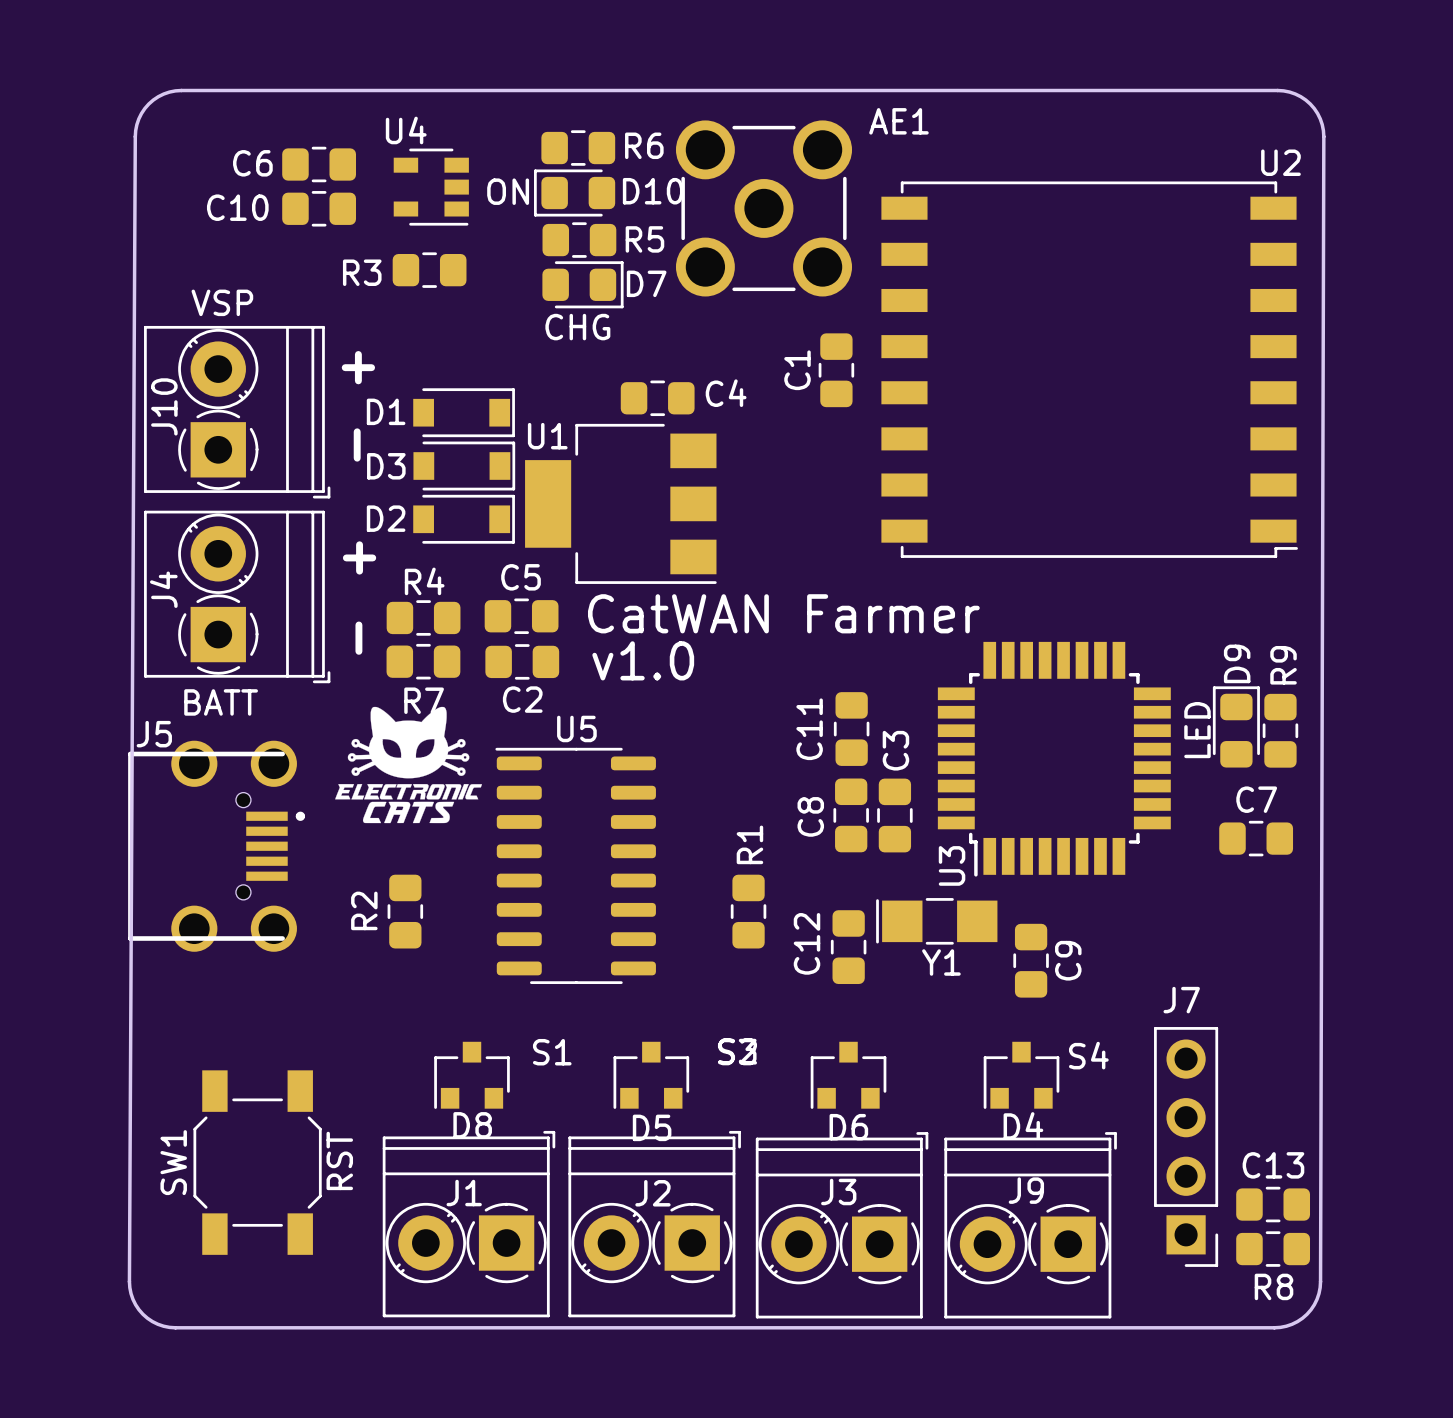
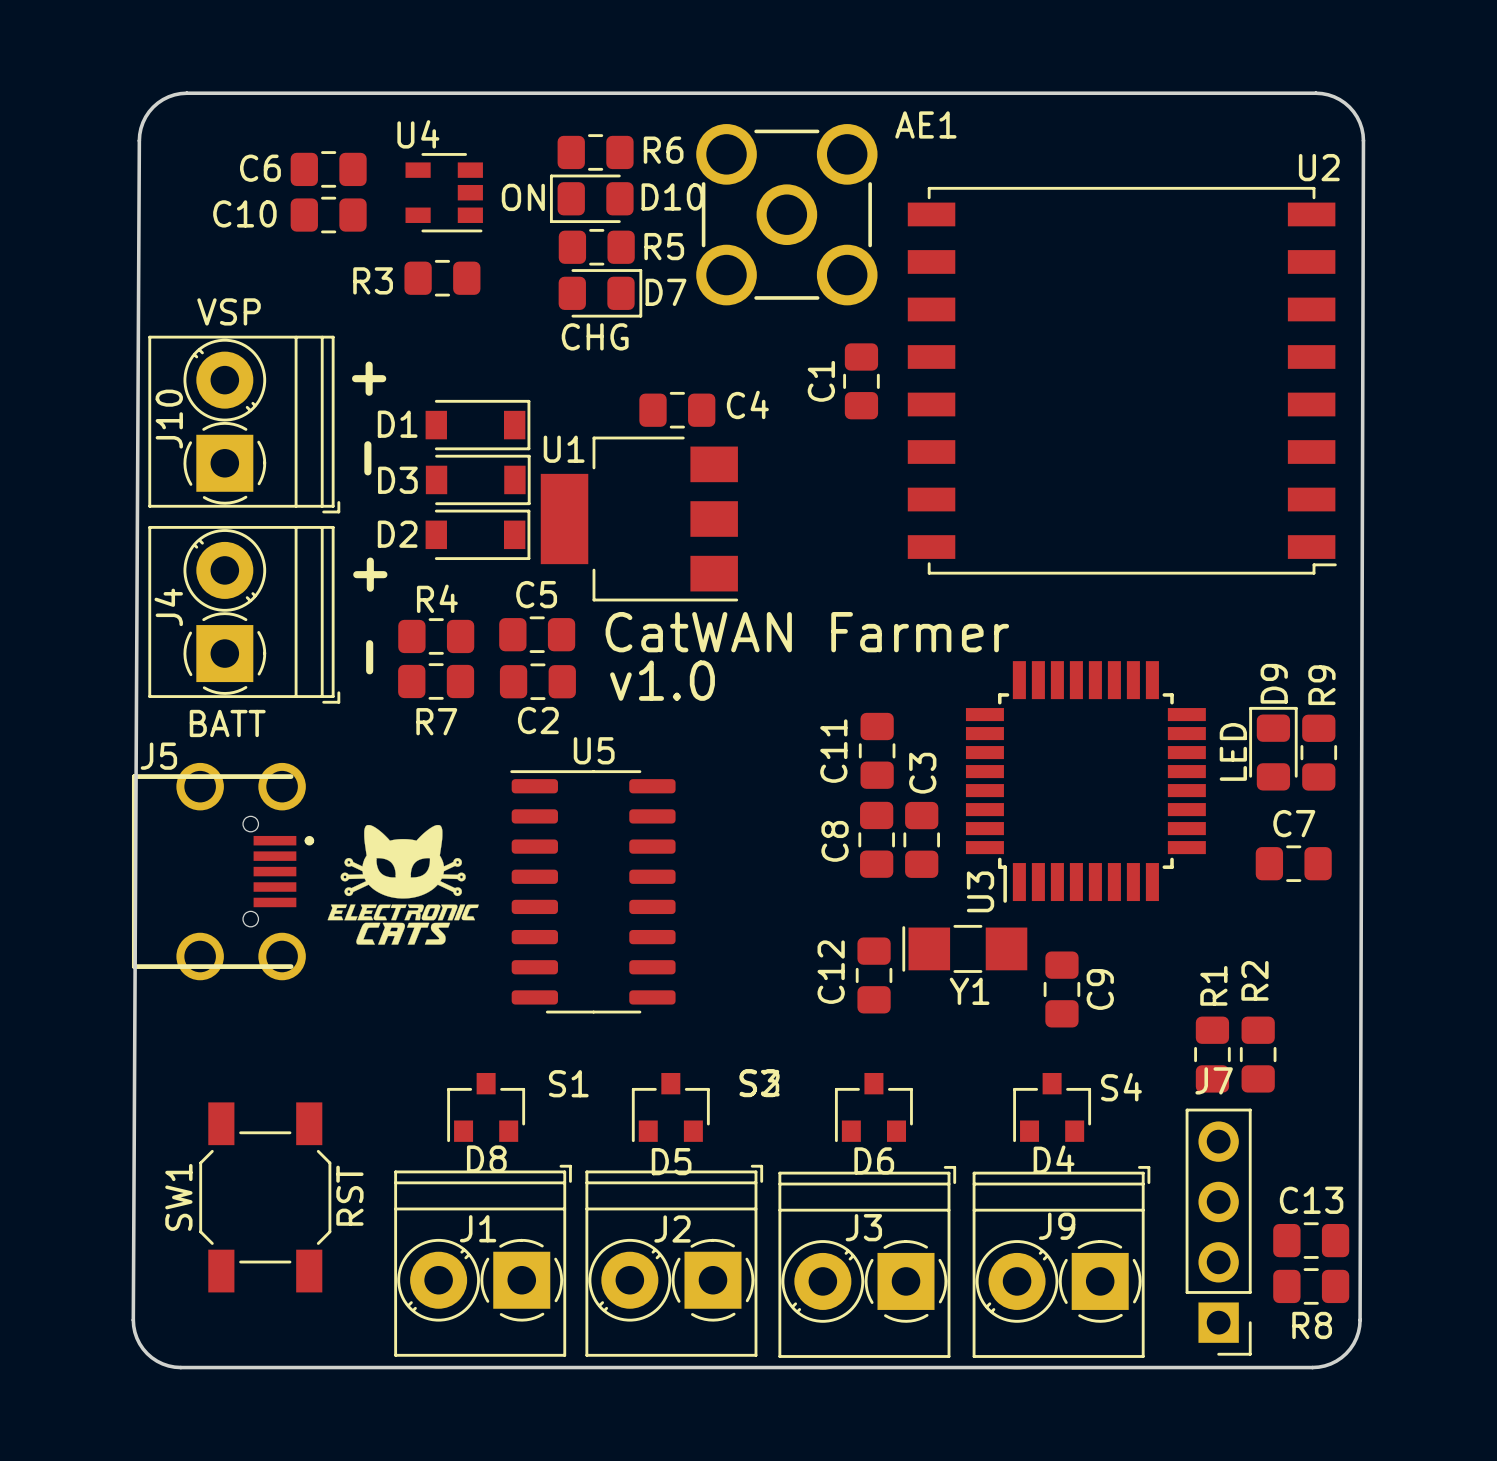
drawing position: (408, 765) -> (403, 884)
R2 name position: R2 (364, 910) -> R2 (1254, 980)
R2 position: (405, 911) -> (1258, 1054)
R1 position: (748, 911) -> (1212, 1054)
J7 position: (1186, 1146) -> (1218, 1232)

